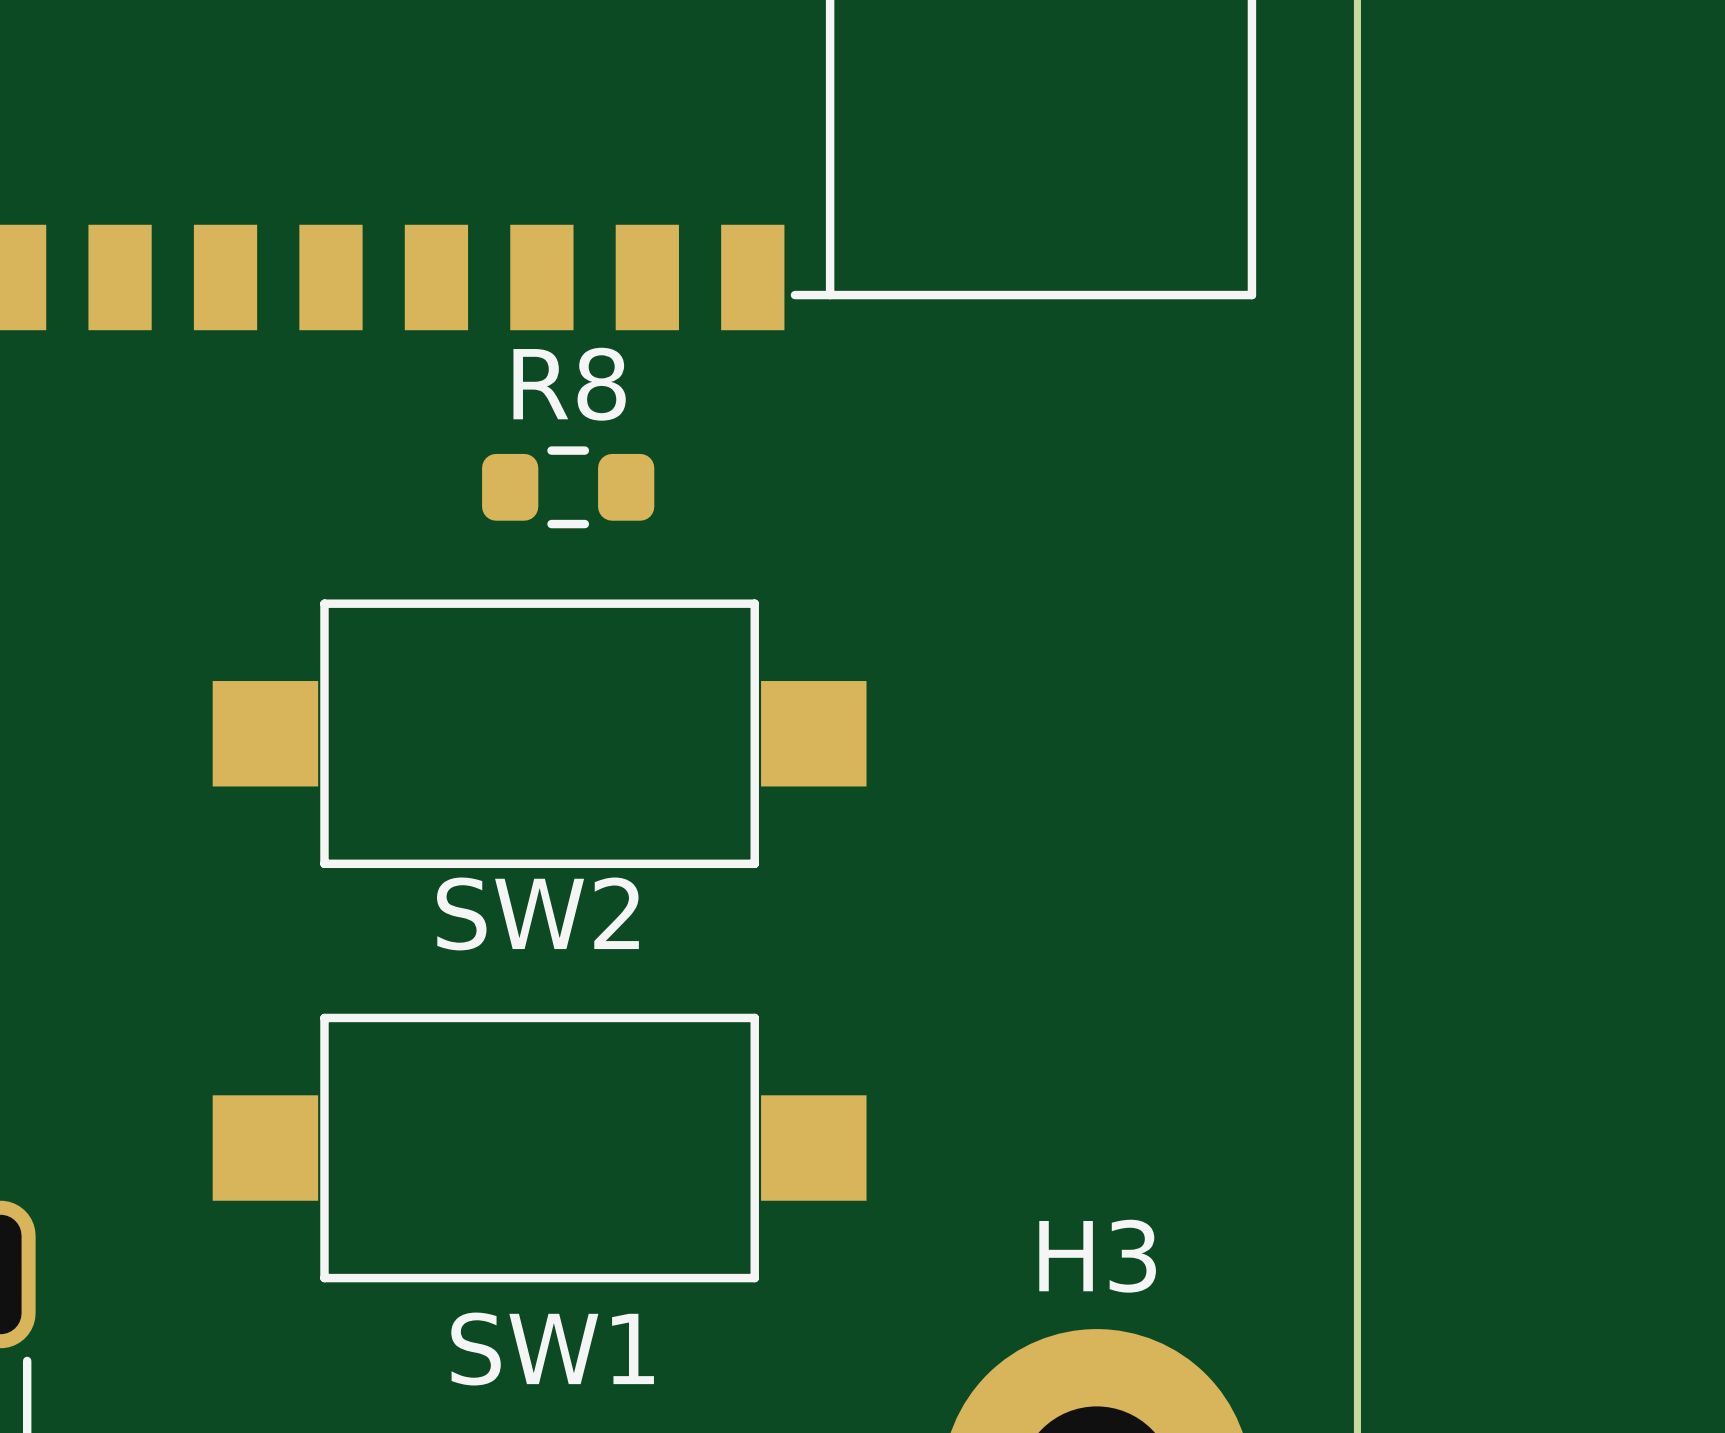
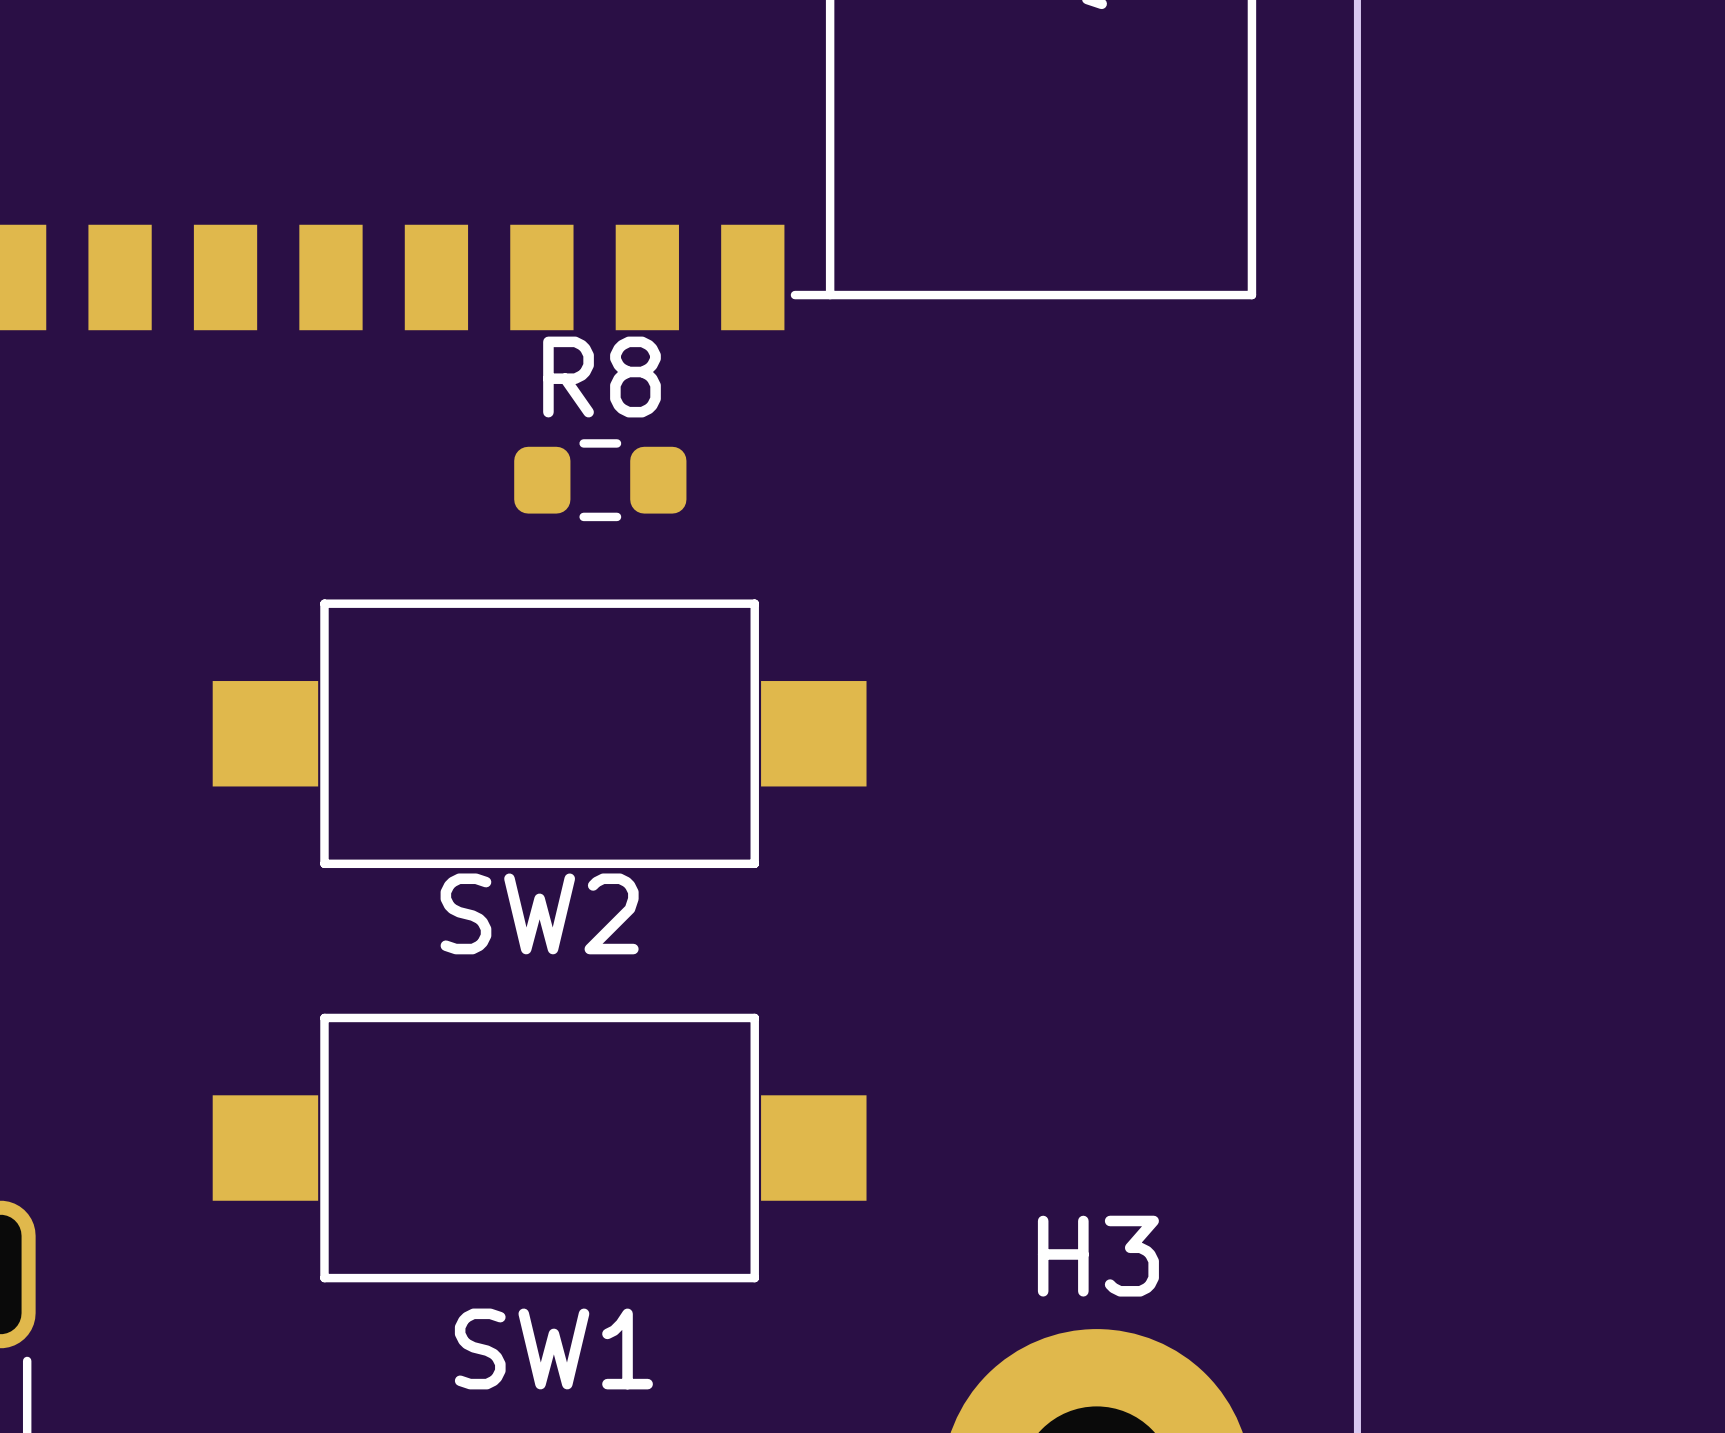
R8 position: (568, 487) -> (600, 480)

